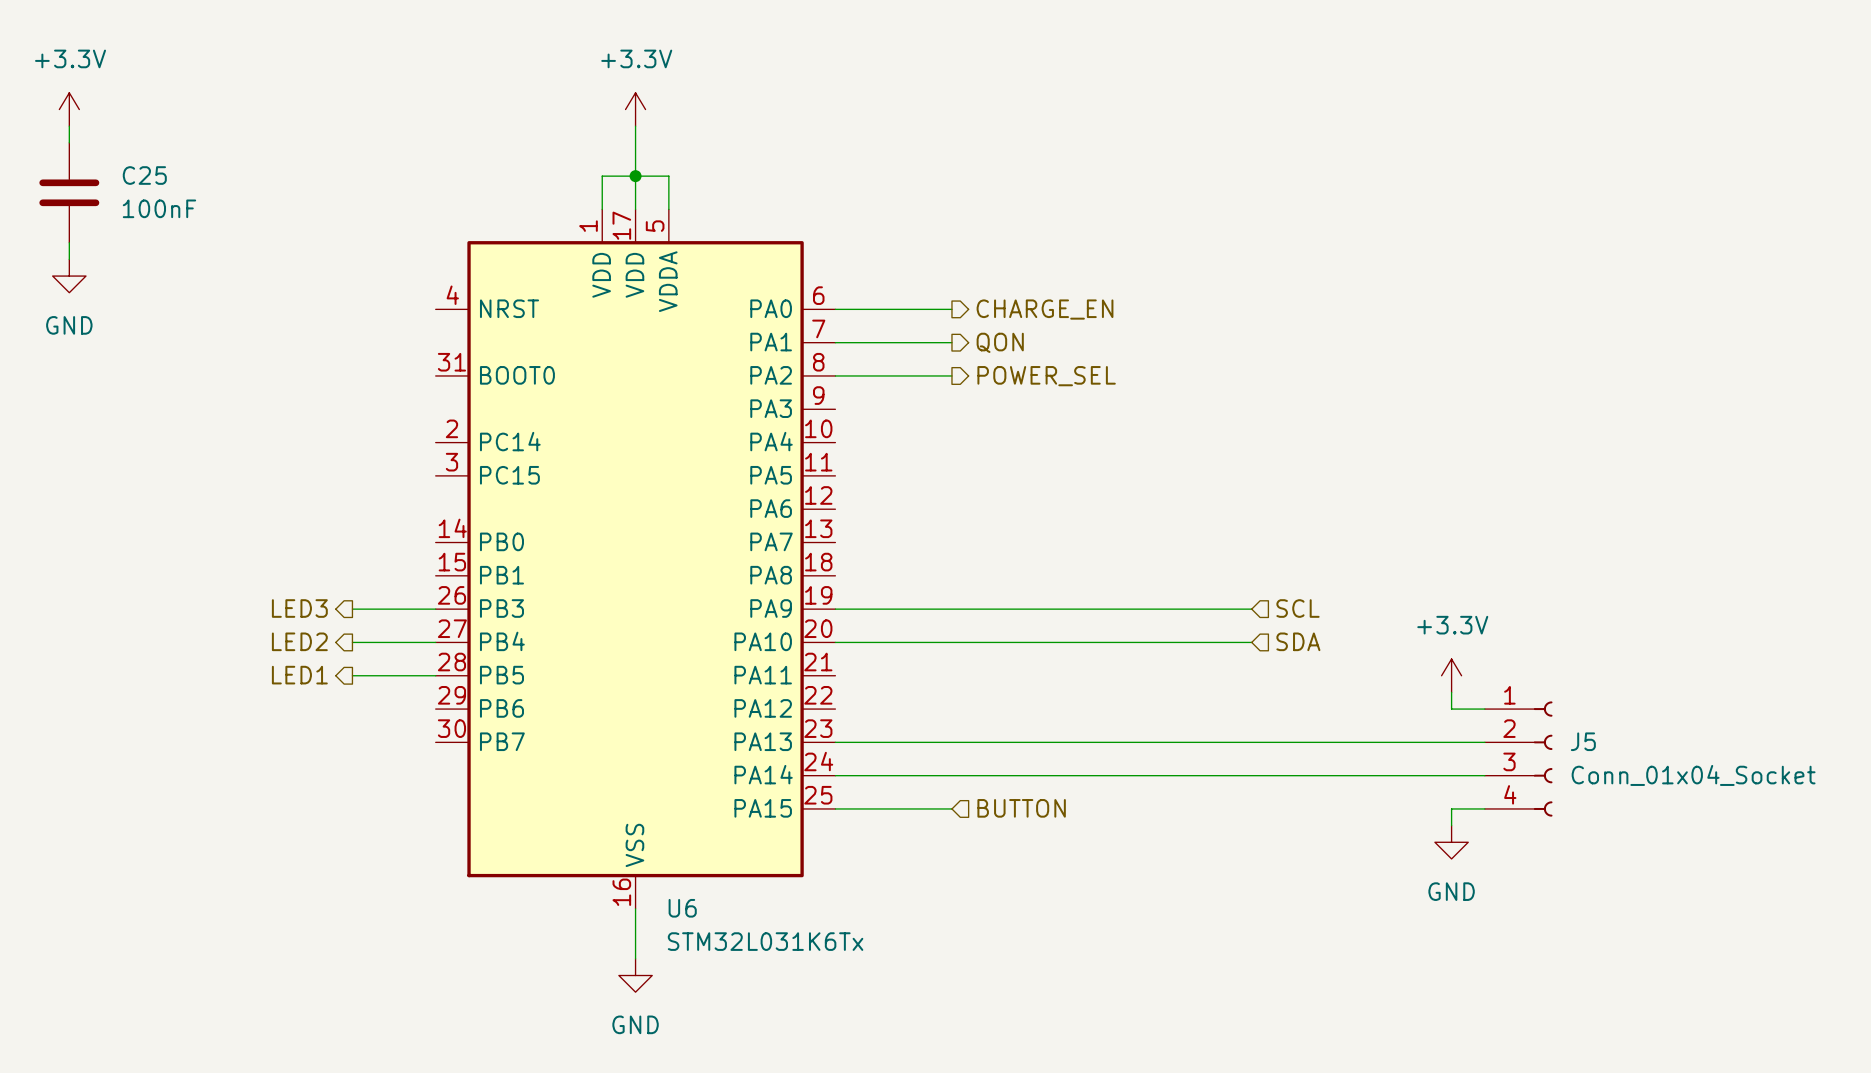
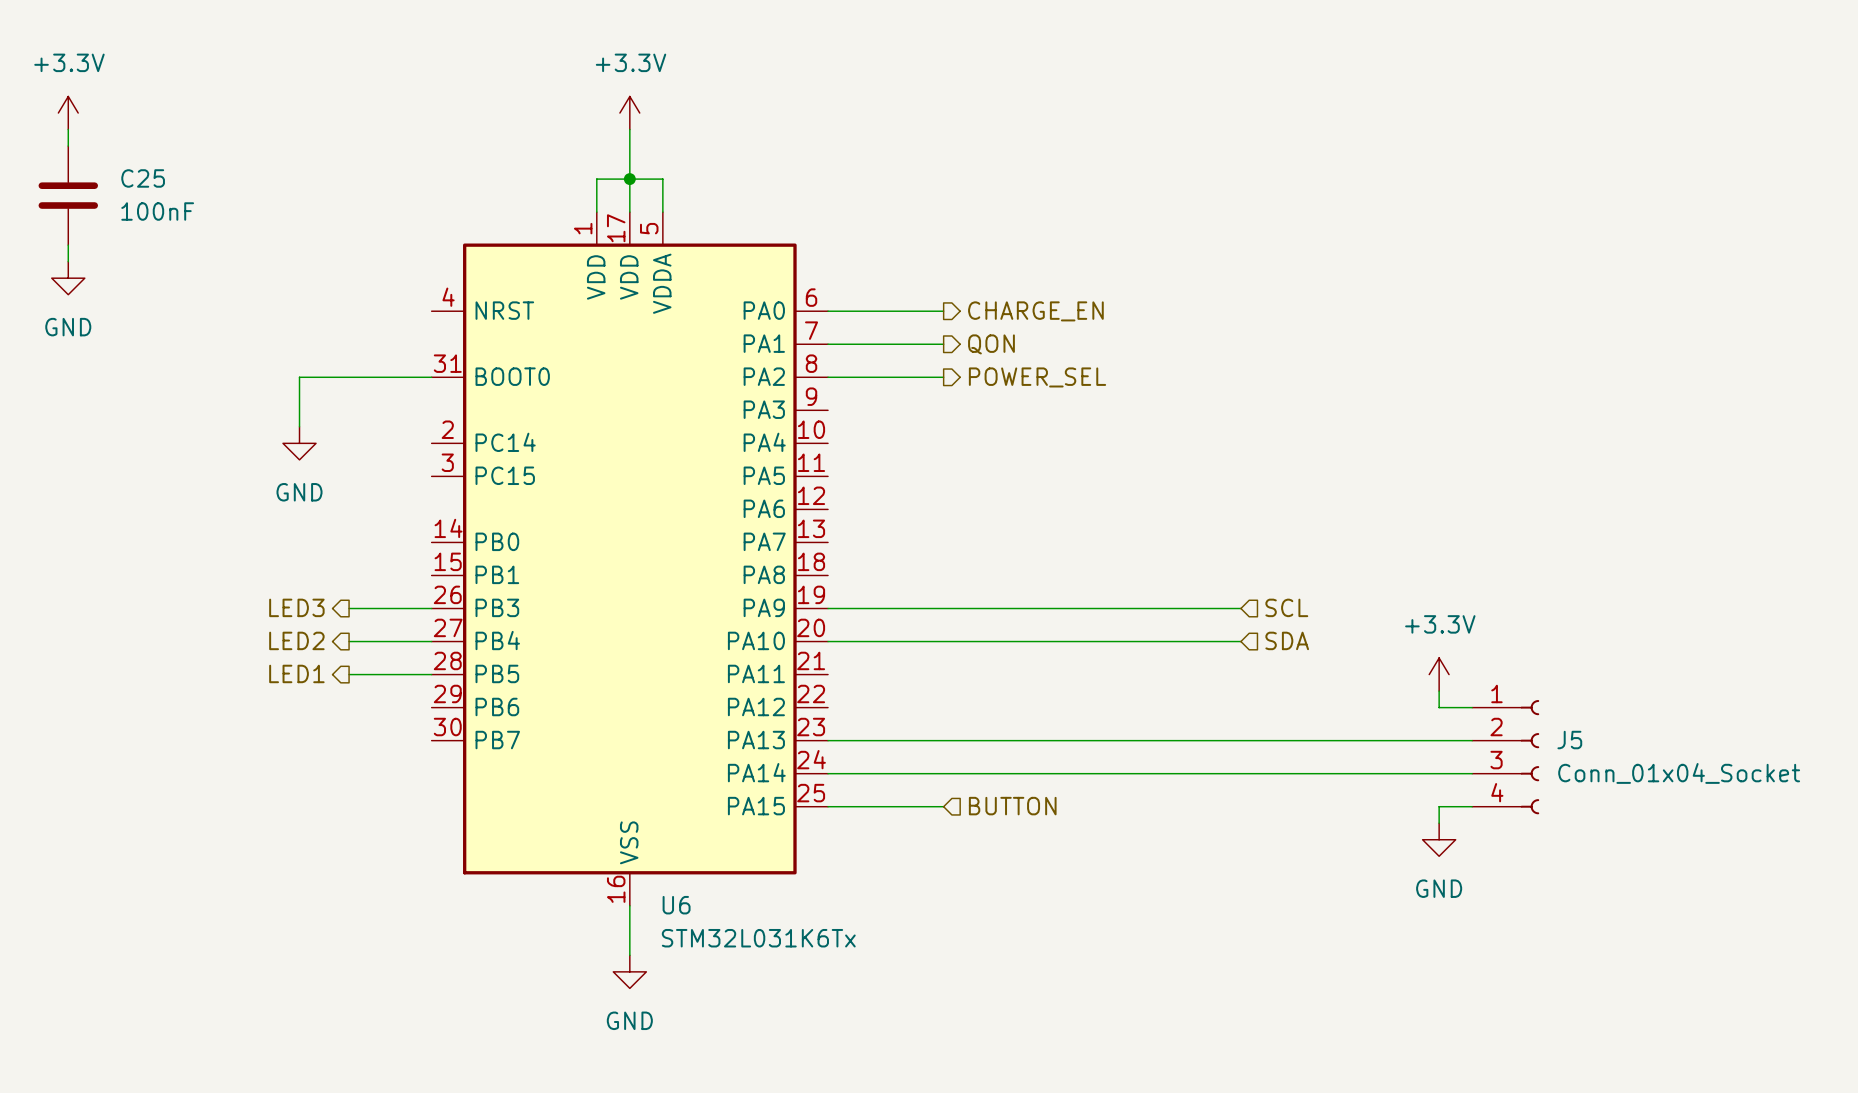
wire: none -> (431, 377) (299, 377) (299, 426)
power symbol: none -> GND (299, 443)

